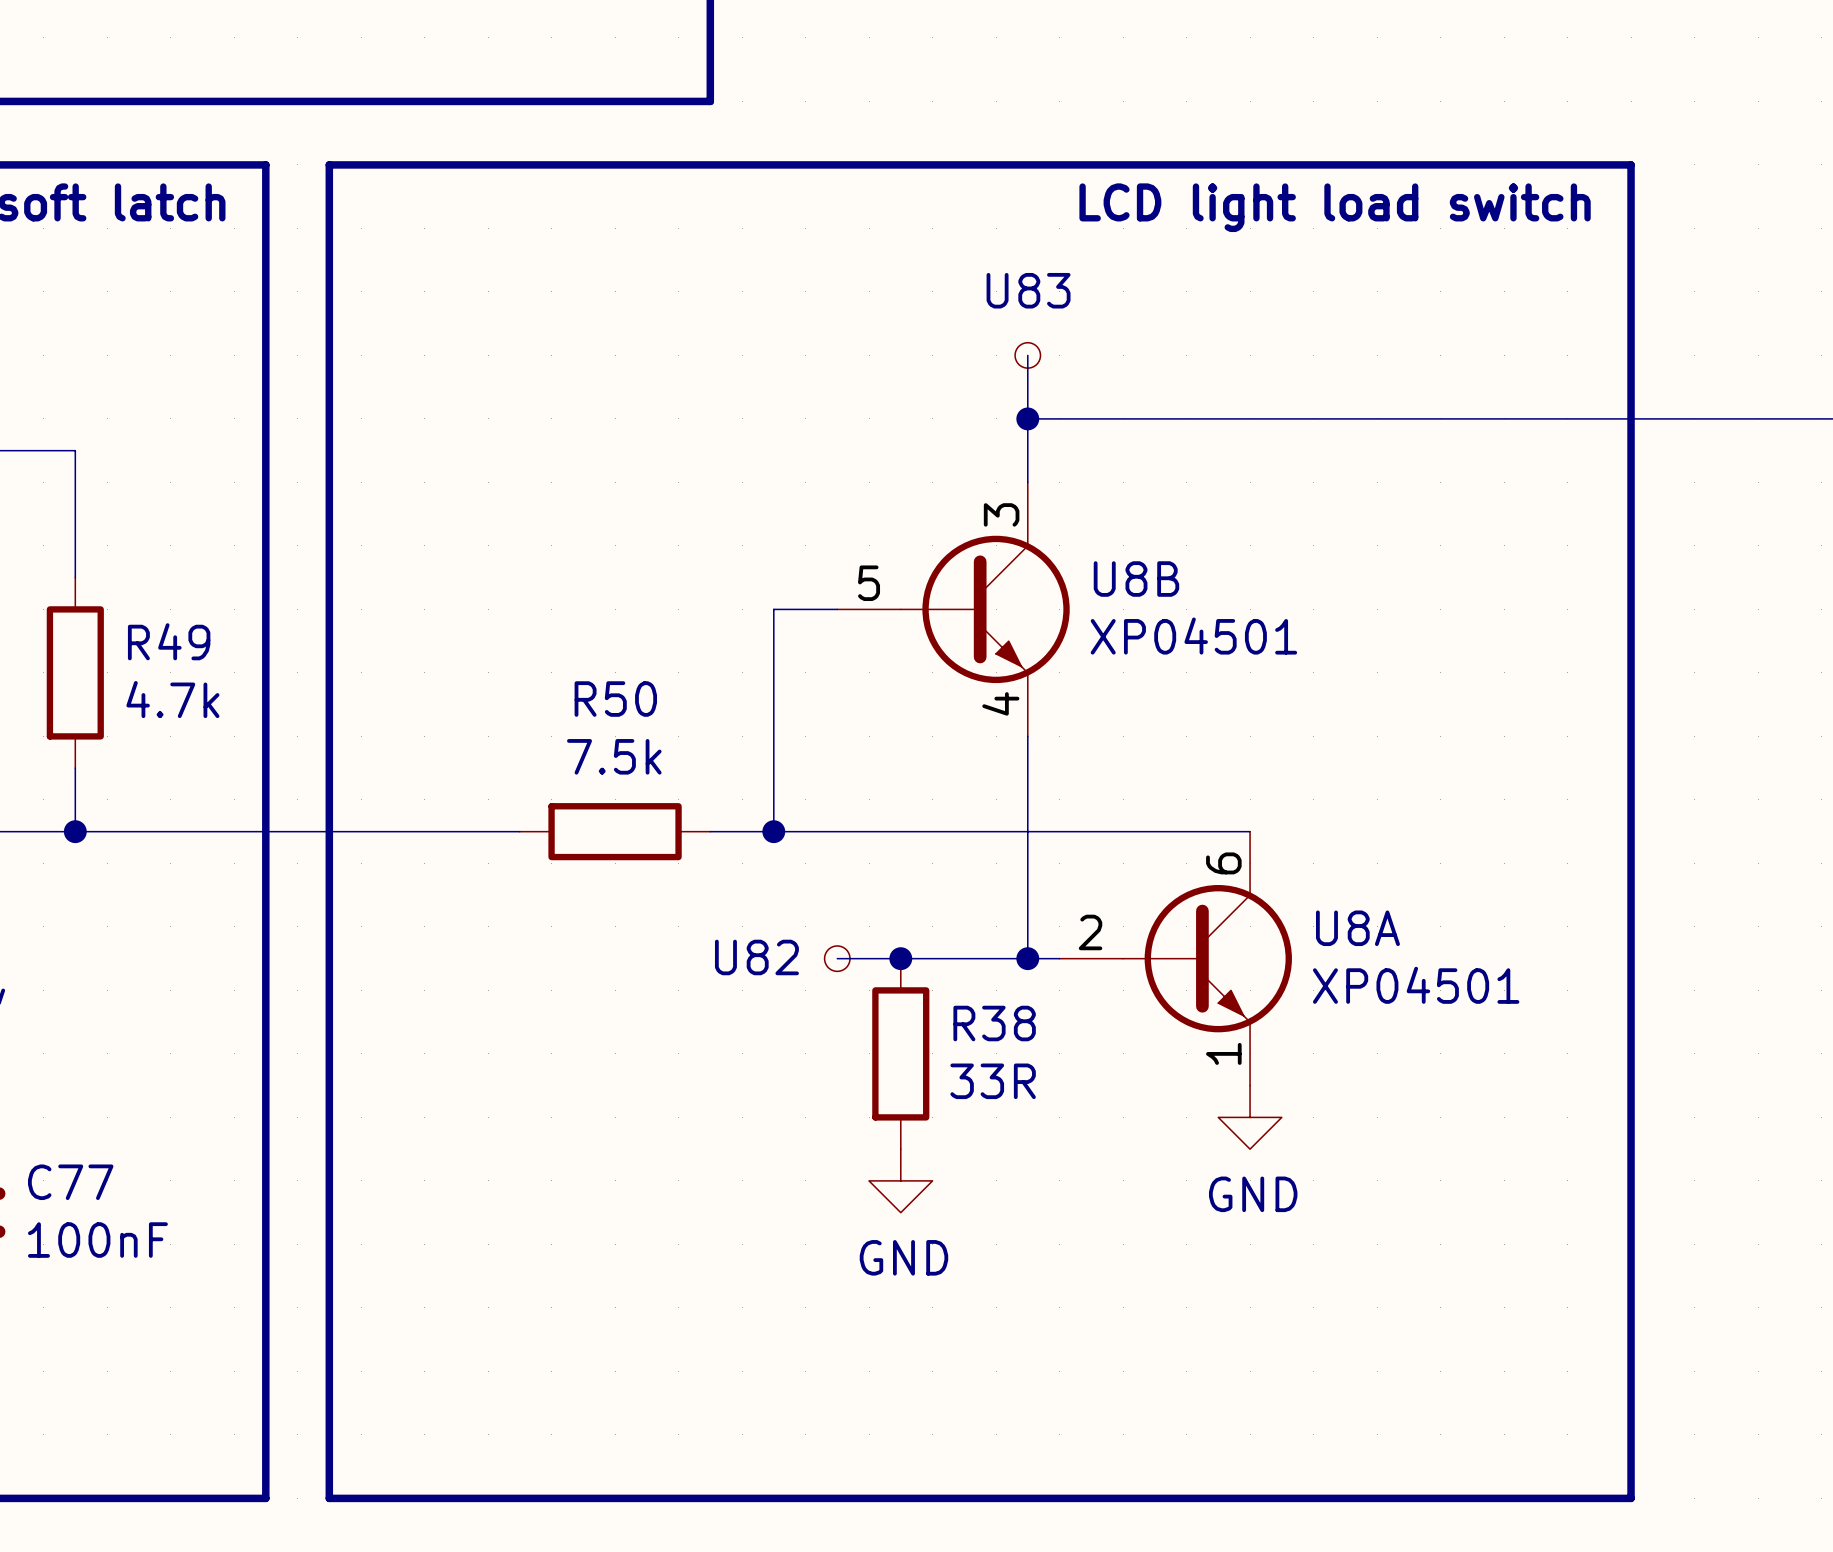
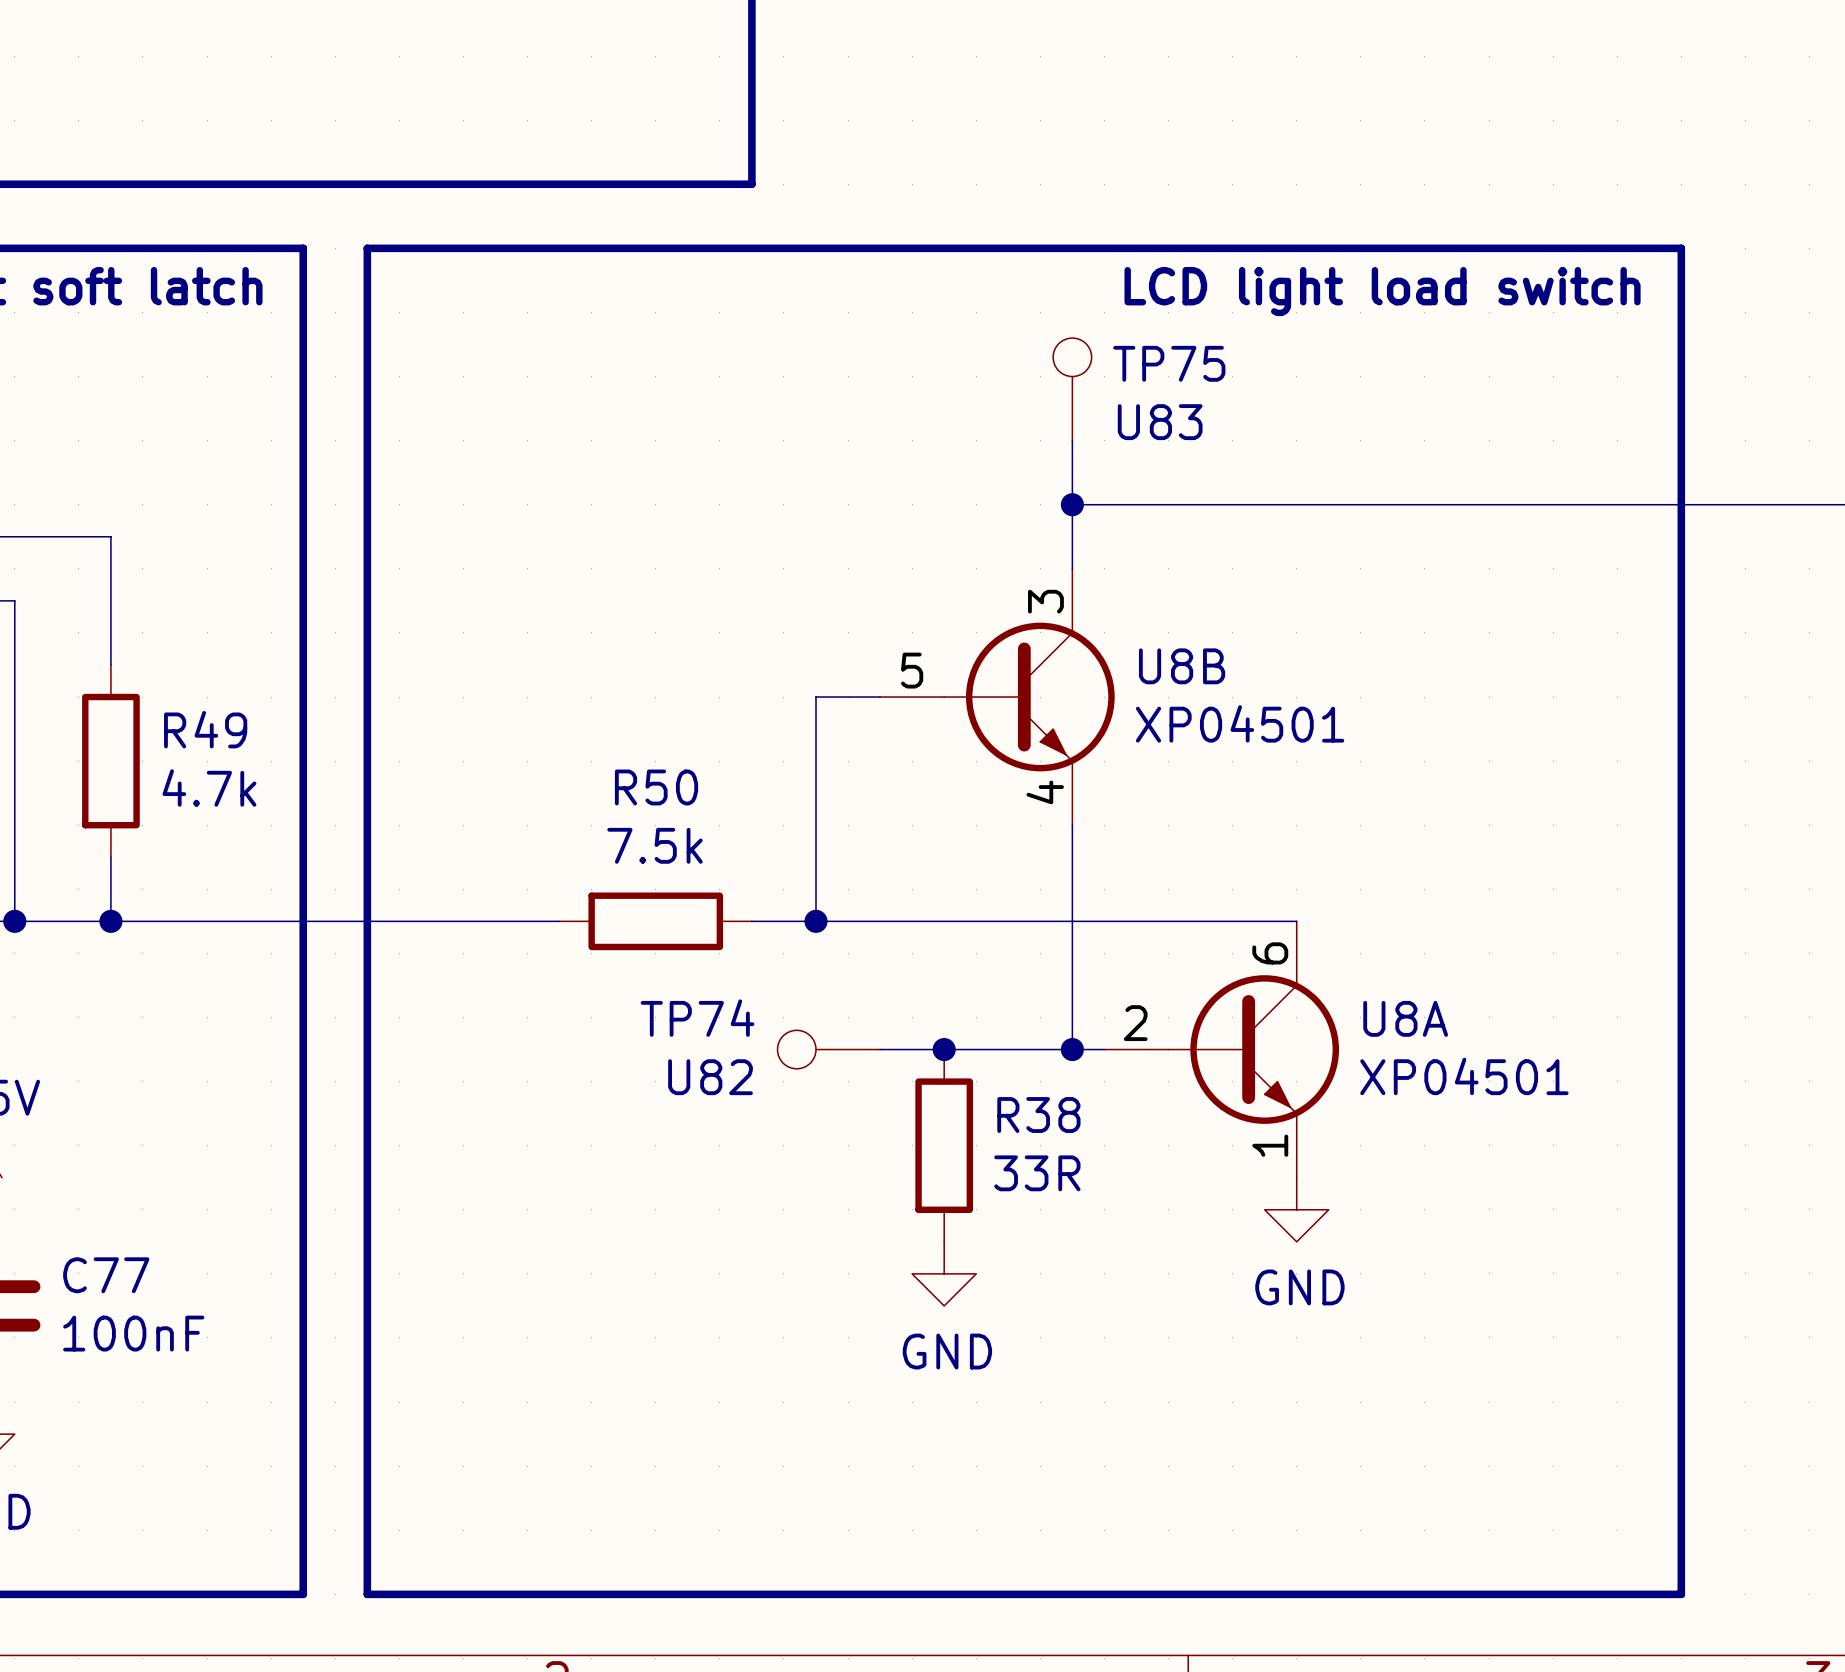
TP75: none -> U83 (1072, 389)
part: U83 (1027, 355) -> none
TP74: none -> U82 (828, 1049)
part: U82 (837, 958) -> none

